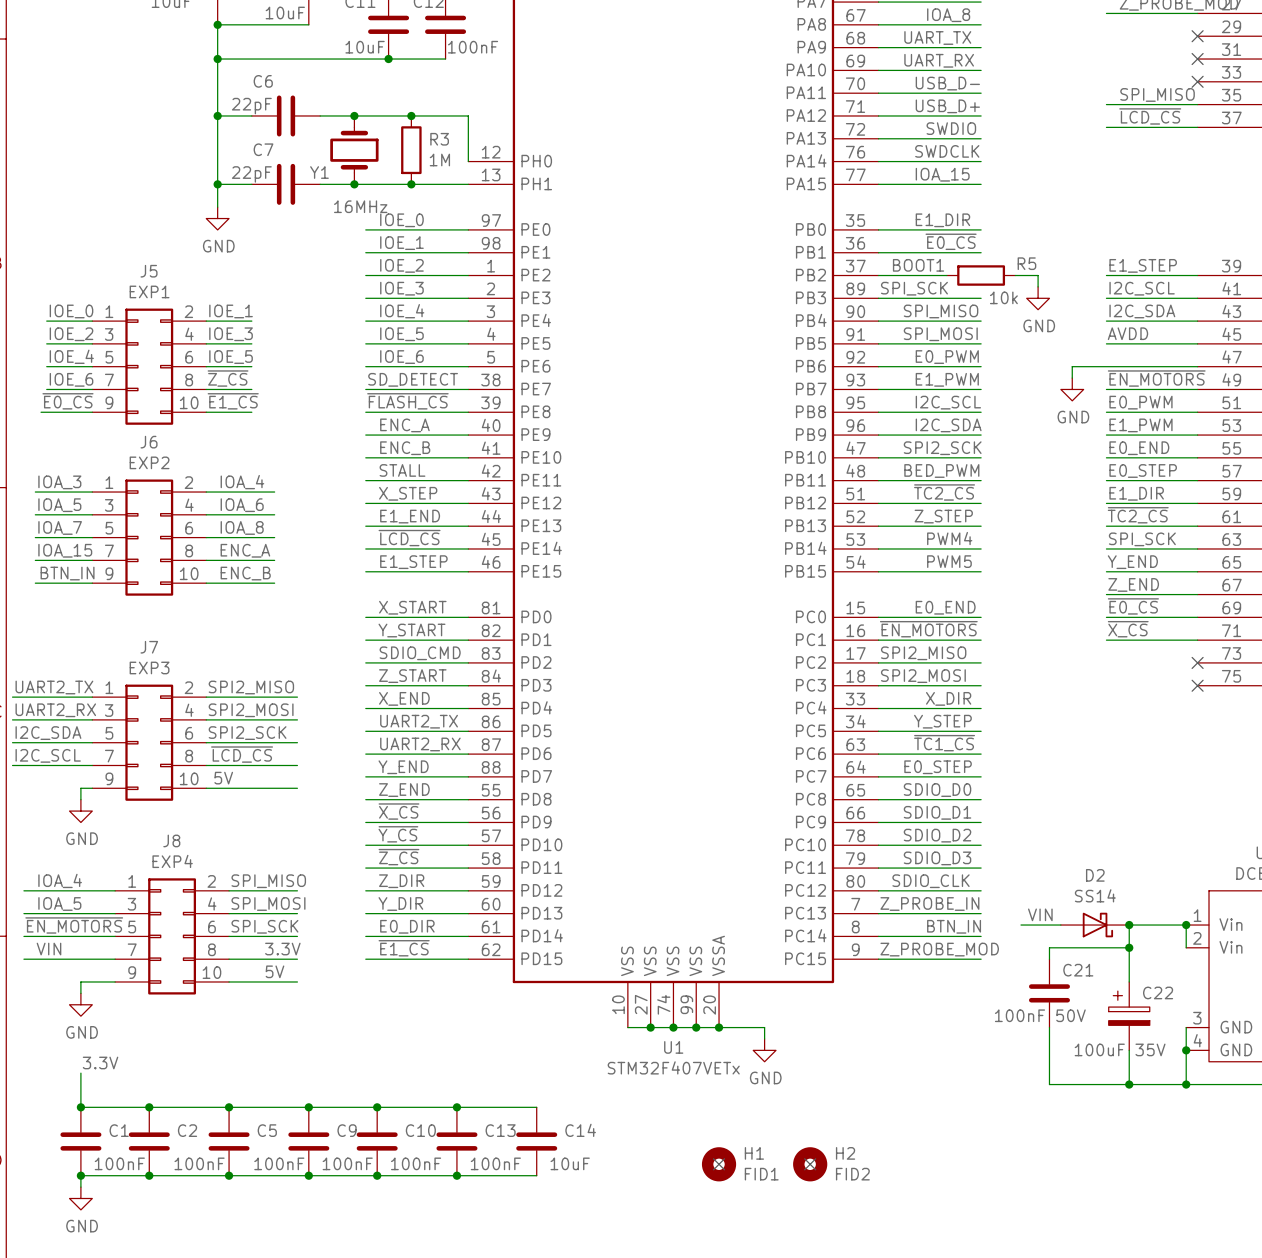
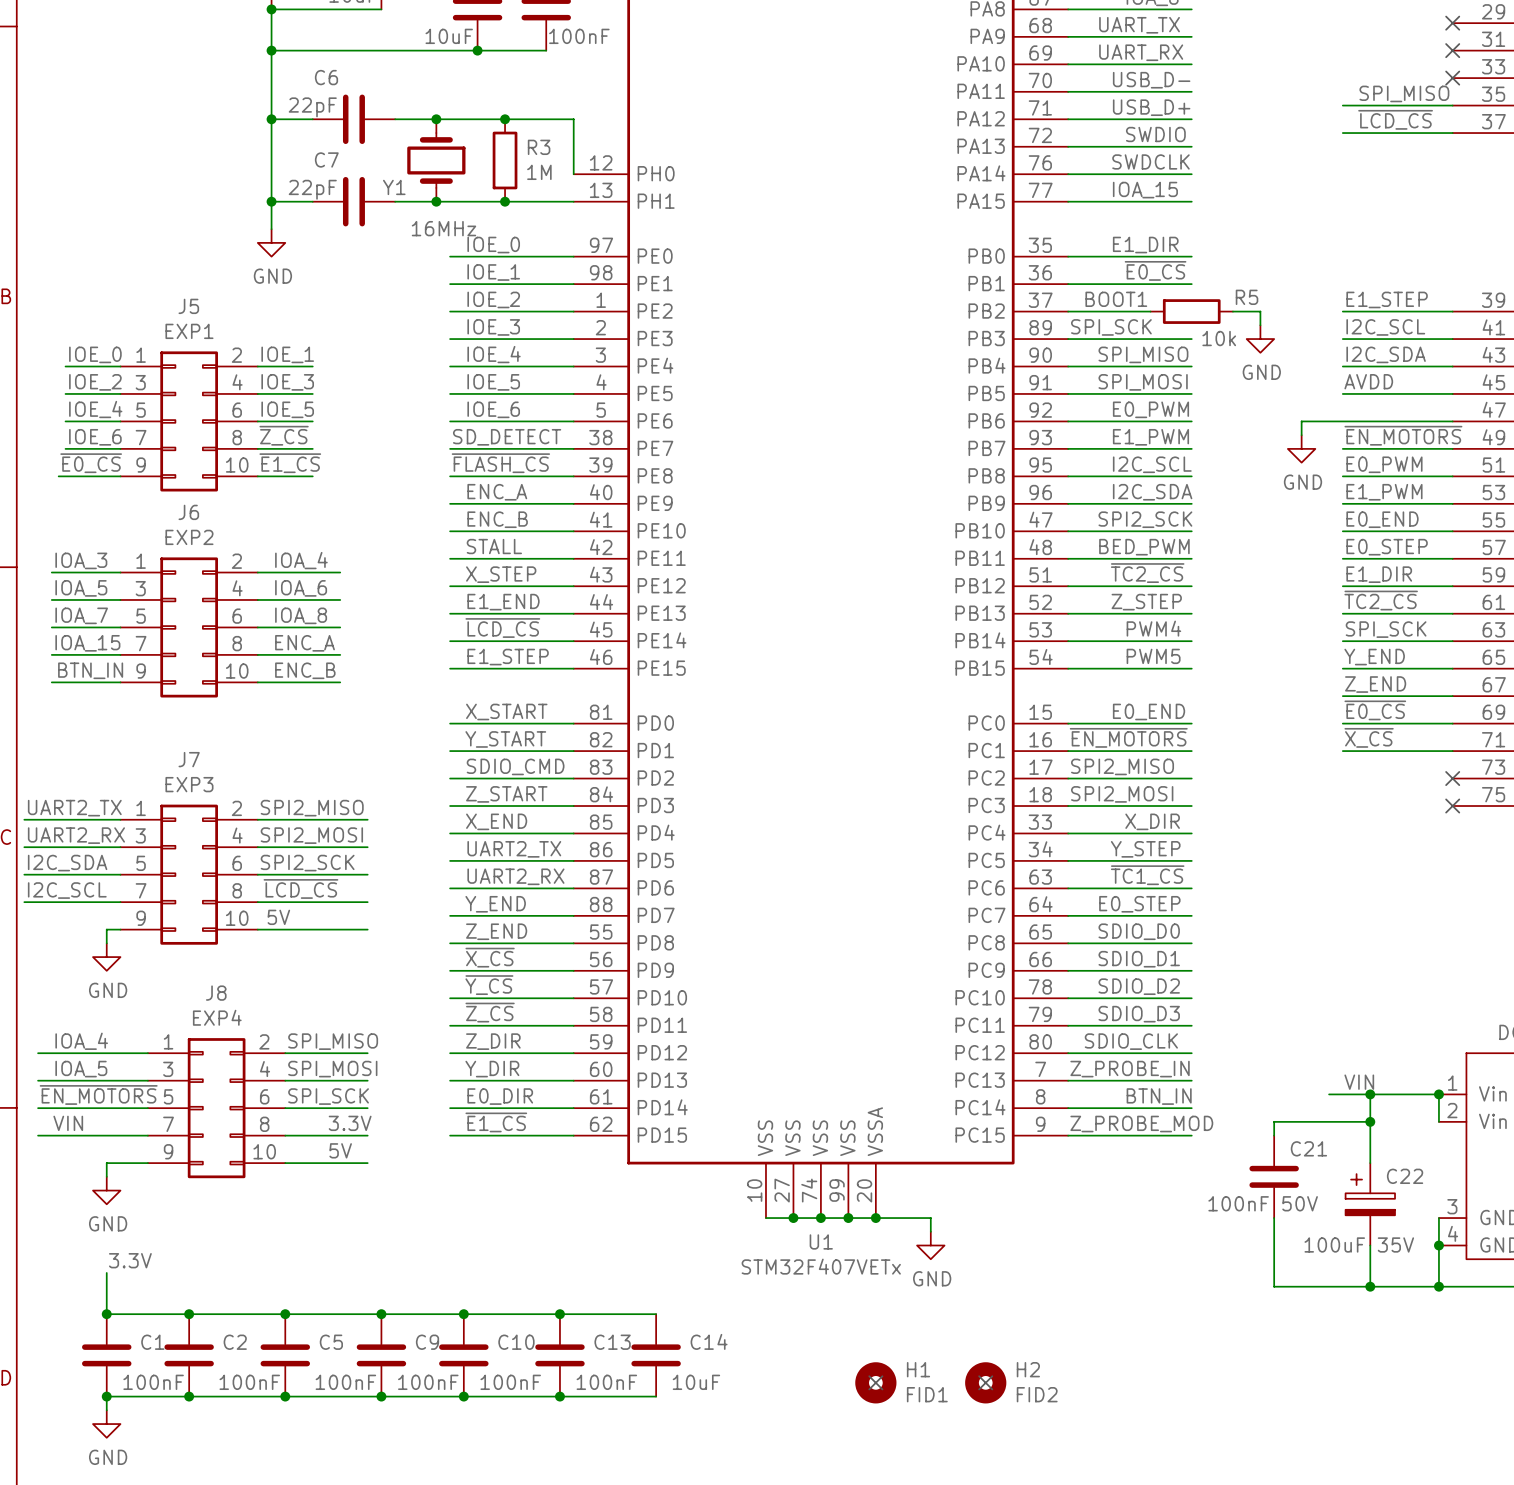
label position: VIN (1040, 914) -> VIN (1359, 1082)
wire: (1020, 925) (1060, 925) -> none
D2: SS14 (1095, 925) -> none

